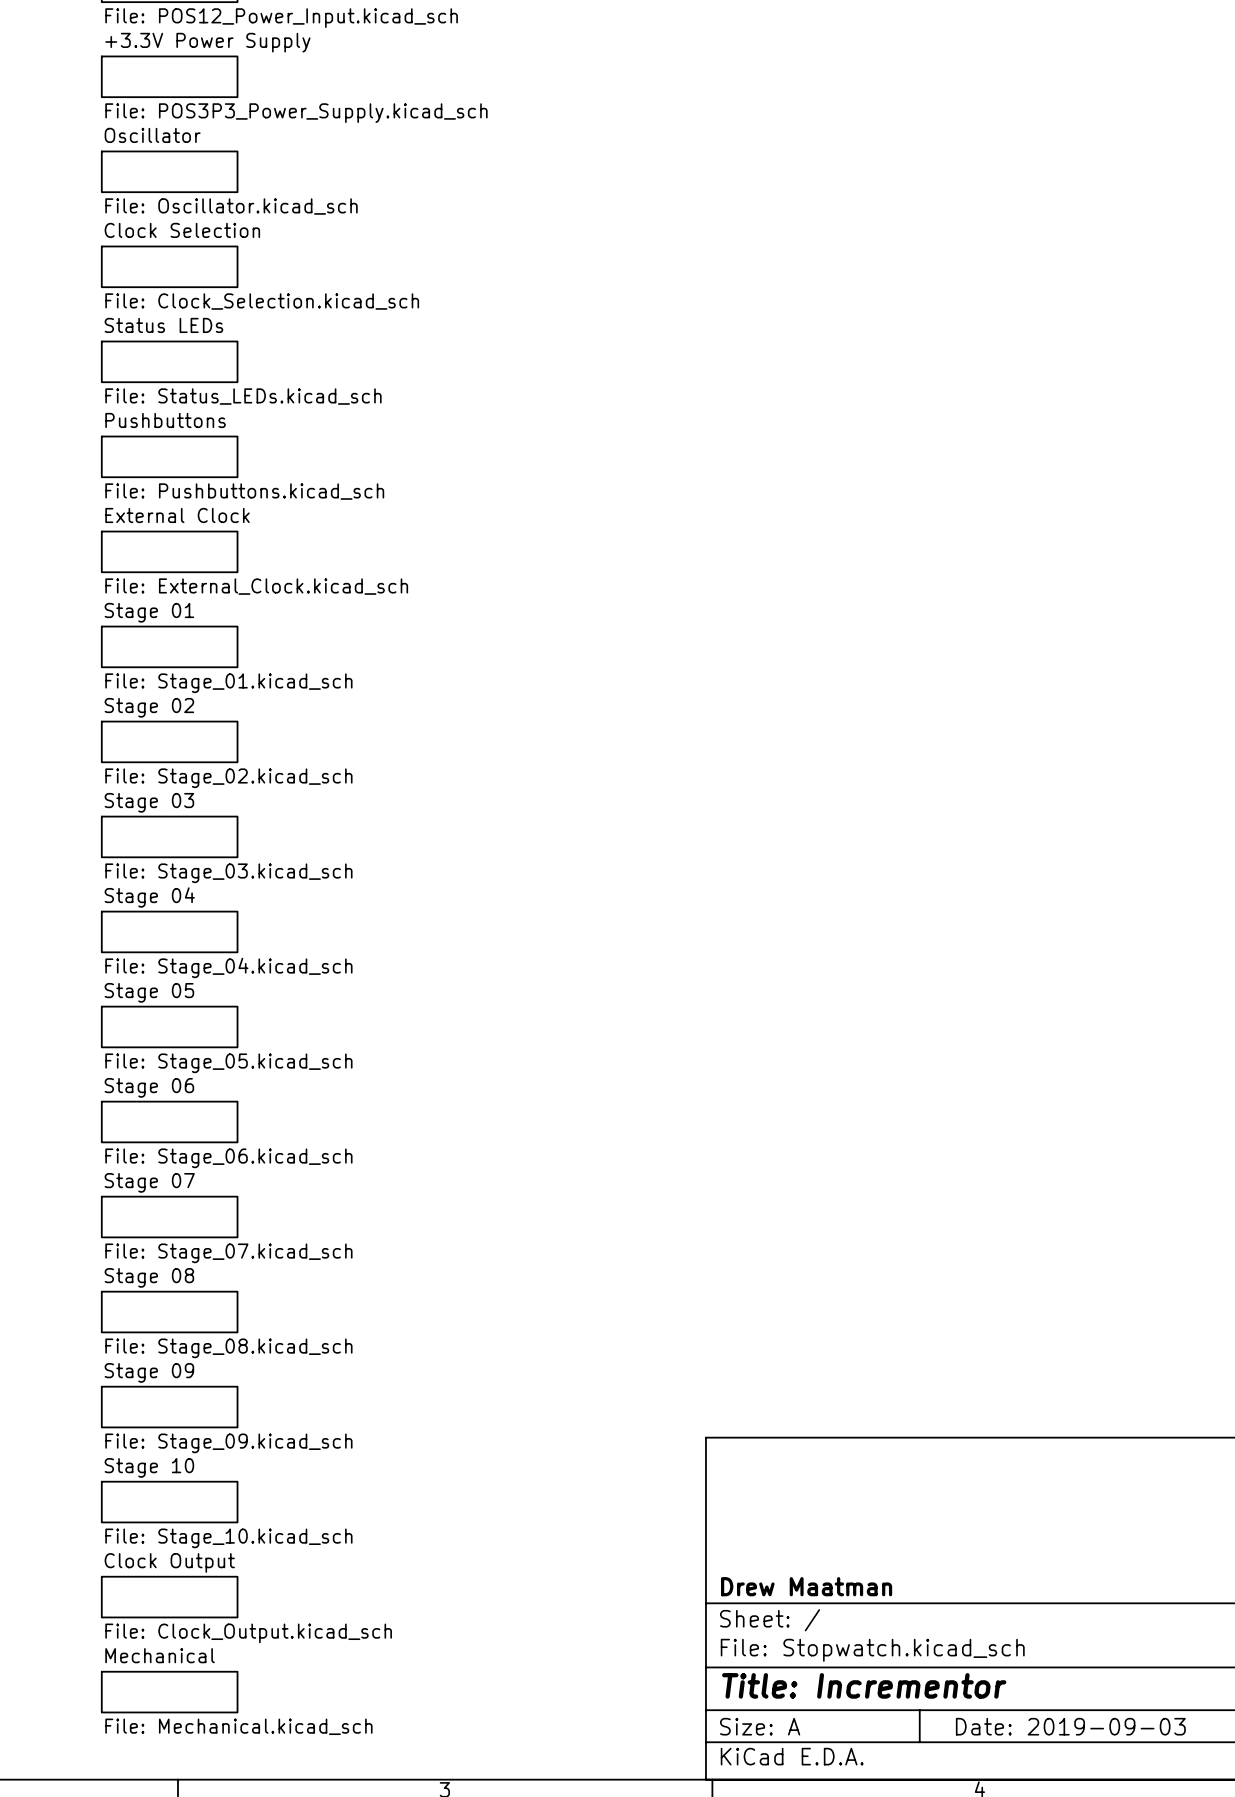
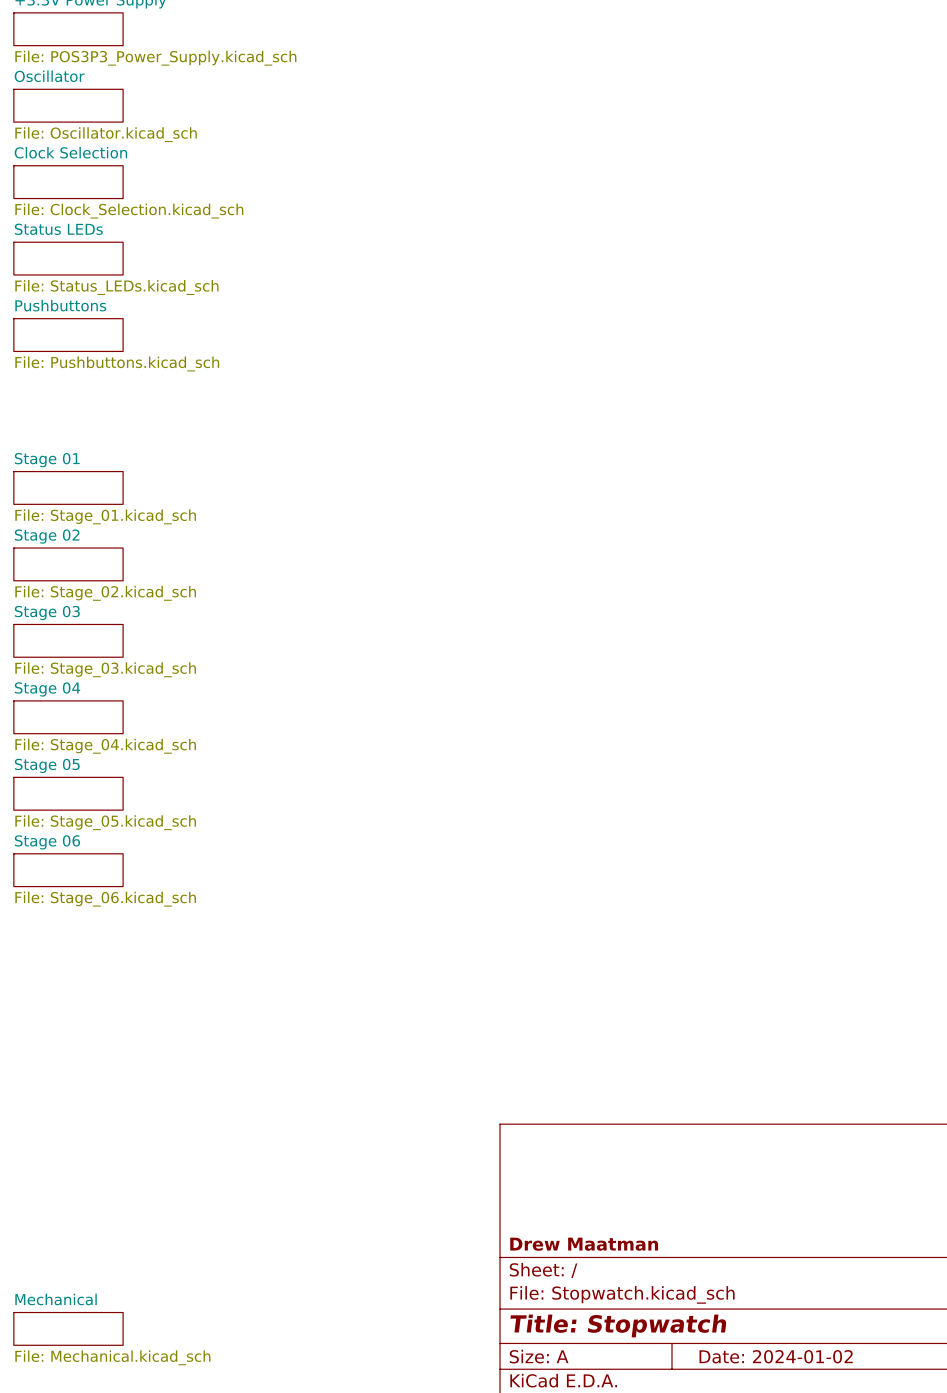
sheet External Clock: File: External_Clock.kicad_sch (169, 551) -> none
sheet Stage 07: File: Stage_07.kicad_sch (169, 1217) -> none
sheet Stage 08: File: Stage_08.kicad_sch (169, 1312) -> none
sheet Stage 09: File: Stage_09.kicad_sch (169, 1407) -> none
sheet Stage 10: File: Stage_10.kicad_sch (169, 1502) -> none
sheet Clock Output: File: Clock_Output.kicad_sch (169, 1597) -> none
title block: Title: Incrementor (864, 1685) -> Title: Stopwatch (618, 1325)
title block: Date: 2019-09-03 (1070, 1726) -> Date: 2024-01-02 (776, 1356)

